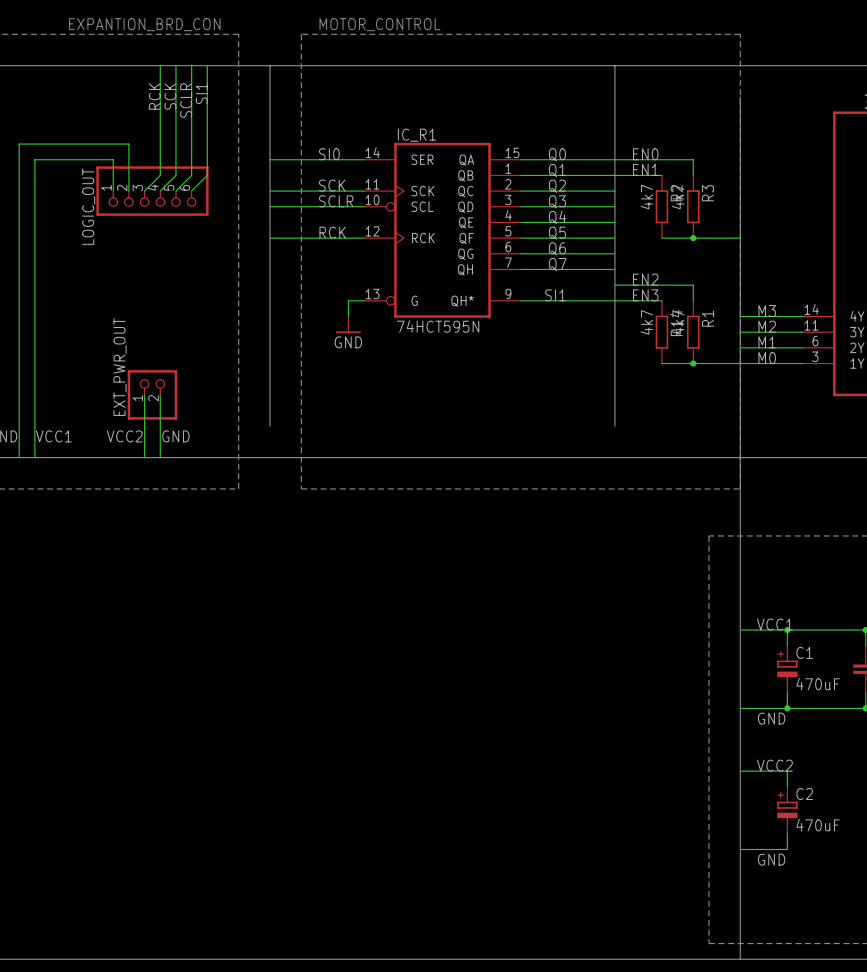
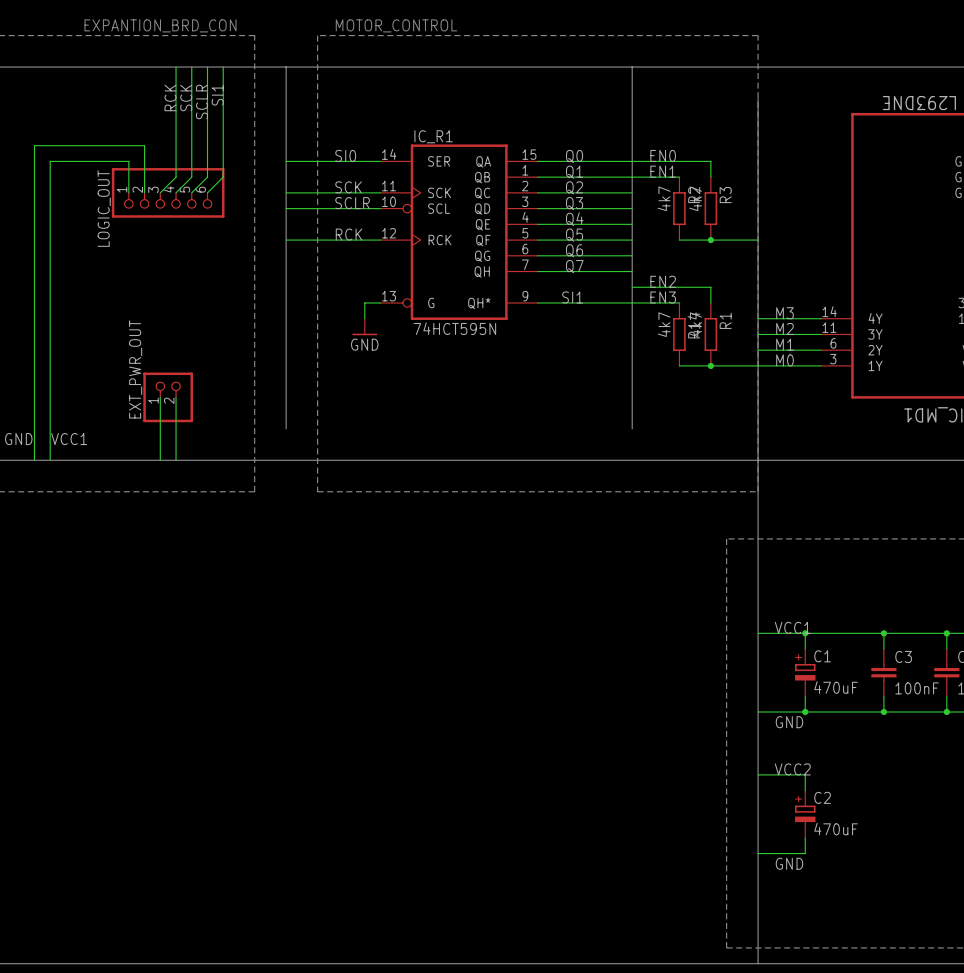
label: VCC2 (124, 436) -> none
label: GND (175, 436) -> none

